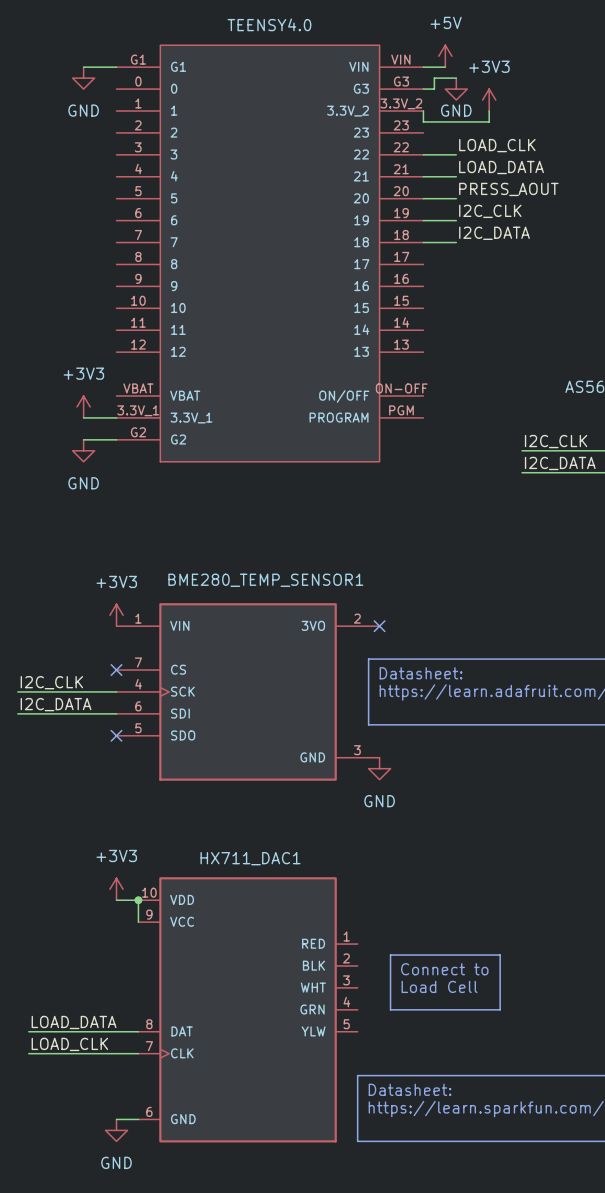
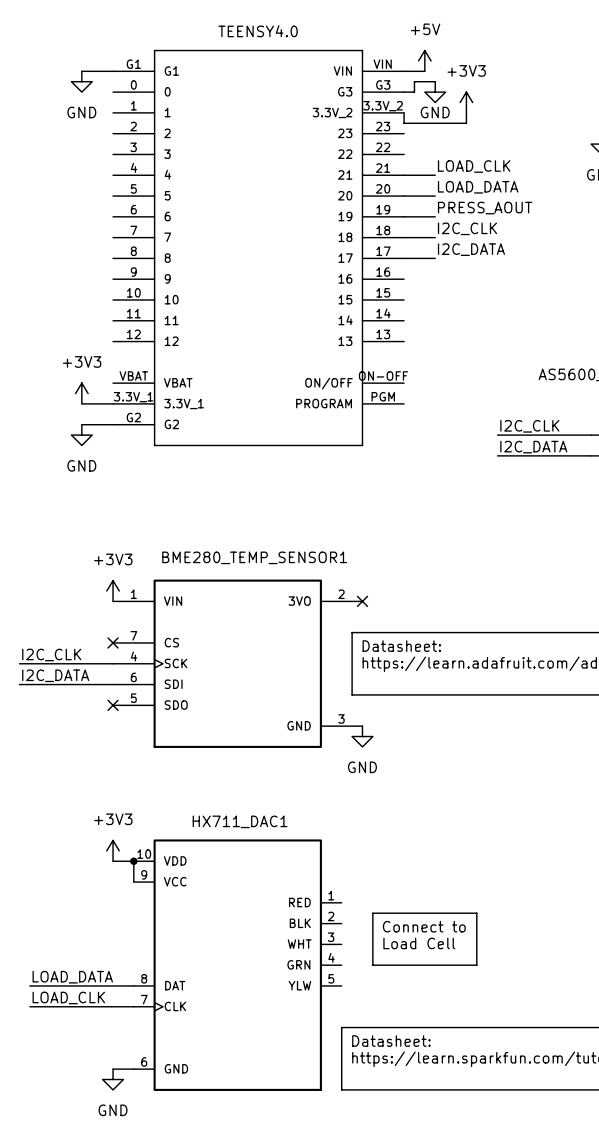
label: LOAD_CLK (497, 145) -> none
wire: (423, 154) (456, 154) -> (404, 258) (435, 258)
label: LOAD_DATA (501, 167) -> LOAD_CLK (474, 166)
label: PRESS_AOUT (508, 189) -> LOAD_DATA (478, 187)
label: I2C_CLK (490, 211) -> PRESS_AOUT (485, 208)
label: I2C_DATA (494, 233) -> I2C_CLK (467, 228)
label: none -> I2C_DATA (471, 249)

